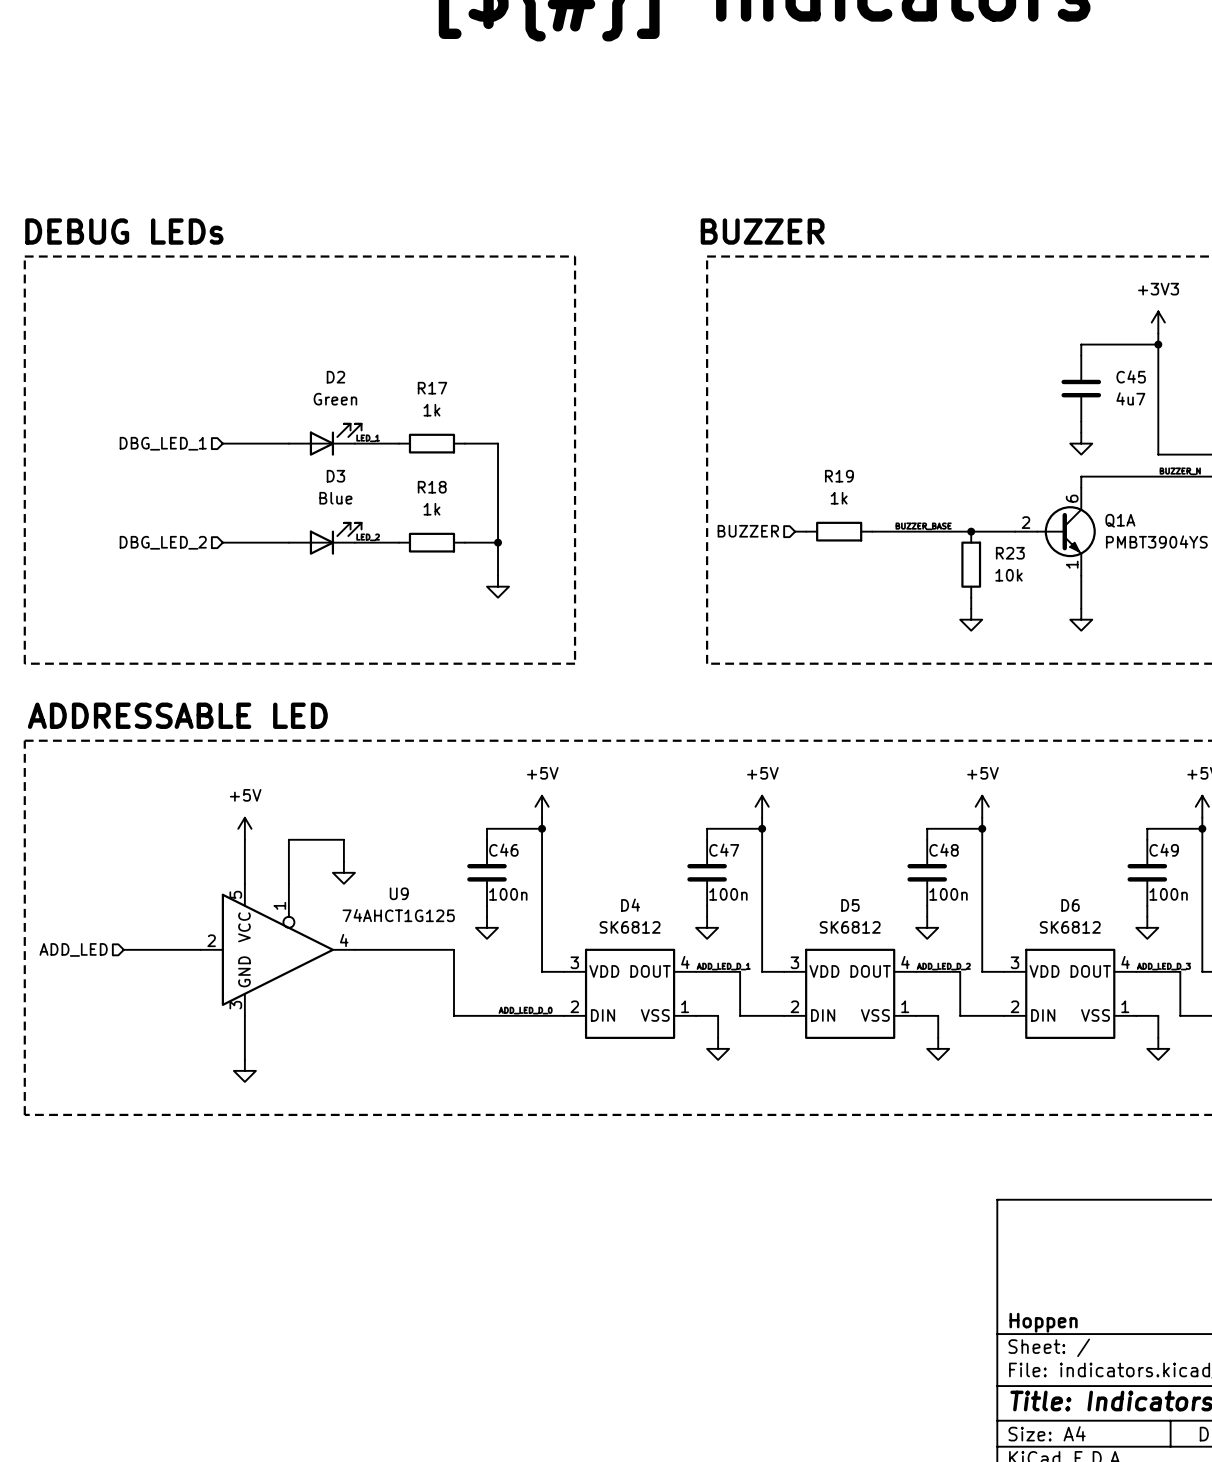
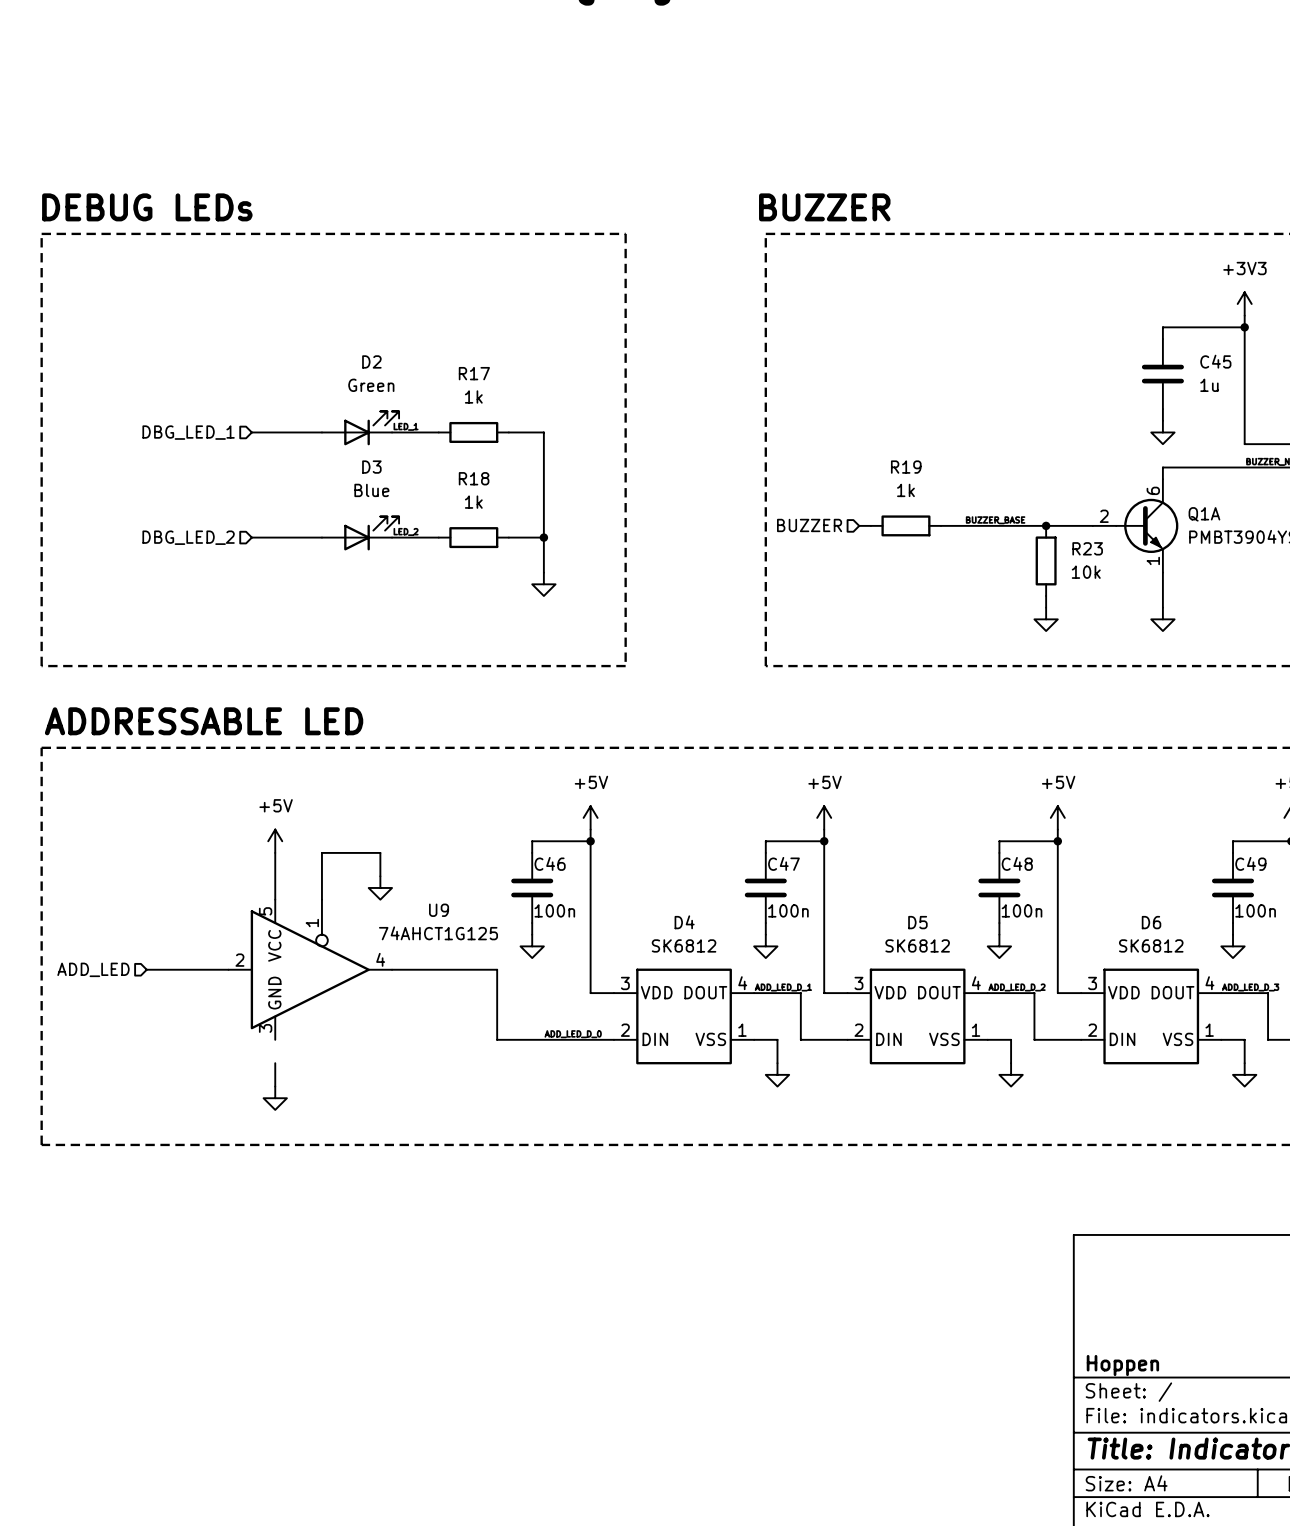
C45 value: 4u7 (1130, 398) -> 1u (1209, 385)
wire: (244, 1015) (244, 1037) -> none

